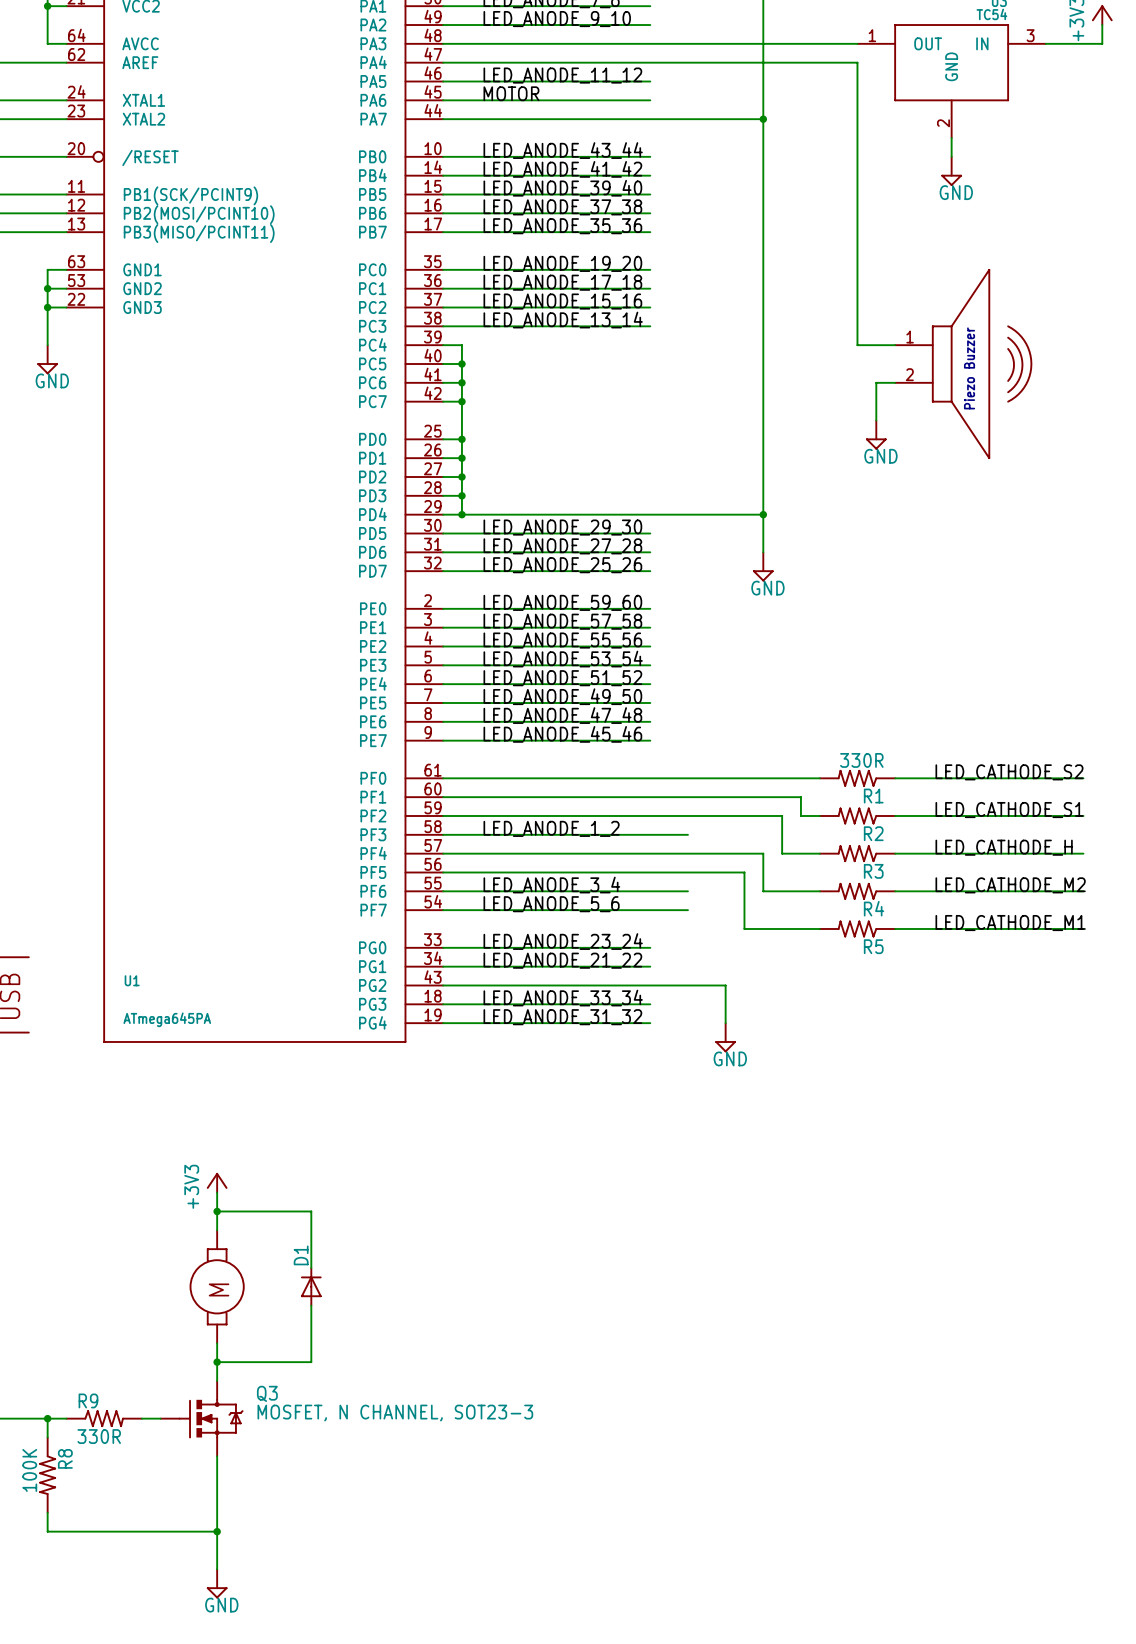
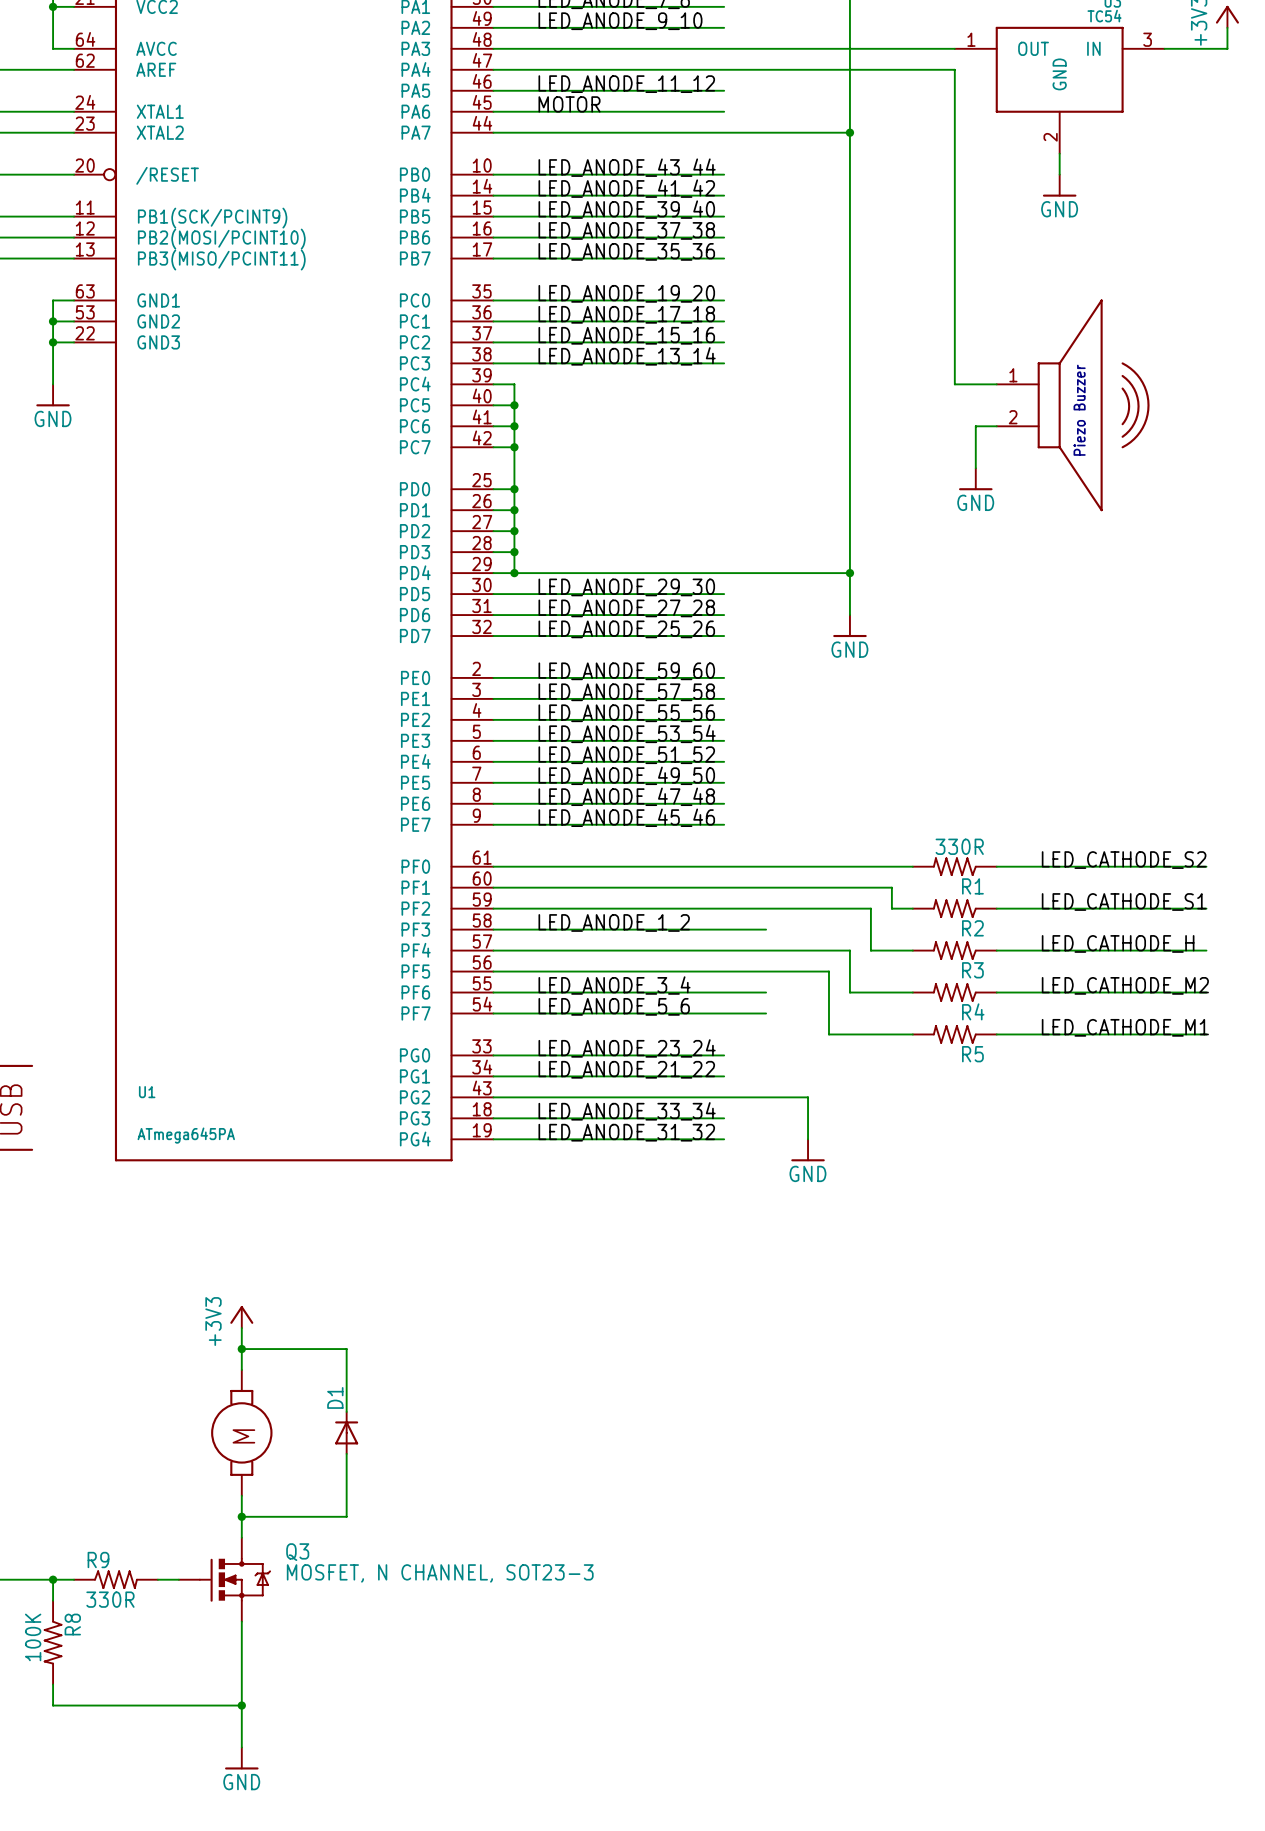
power symbol shape: [941, 156, 962, 187] -> [1042, 174, 1077, 197]
power symbol shape: [37, 345, 59, 375] -> [36, 384, 70, 407]
power symbol shape: [865, 420, 887, 450] -> [959, 468, 993, 491]
power symbol shape: [752, 552, 774, 582] -> [833, 615, 867, 638]
power symbol shape: [715, 1023, 736, 1053] -> [791, 1139, 825, 1162]
power symbol shape: [206, 1569, 228, 1599] -> [225, 1747, 259, 1770]

